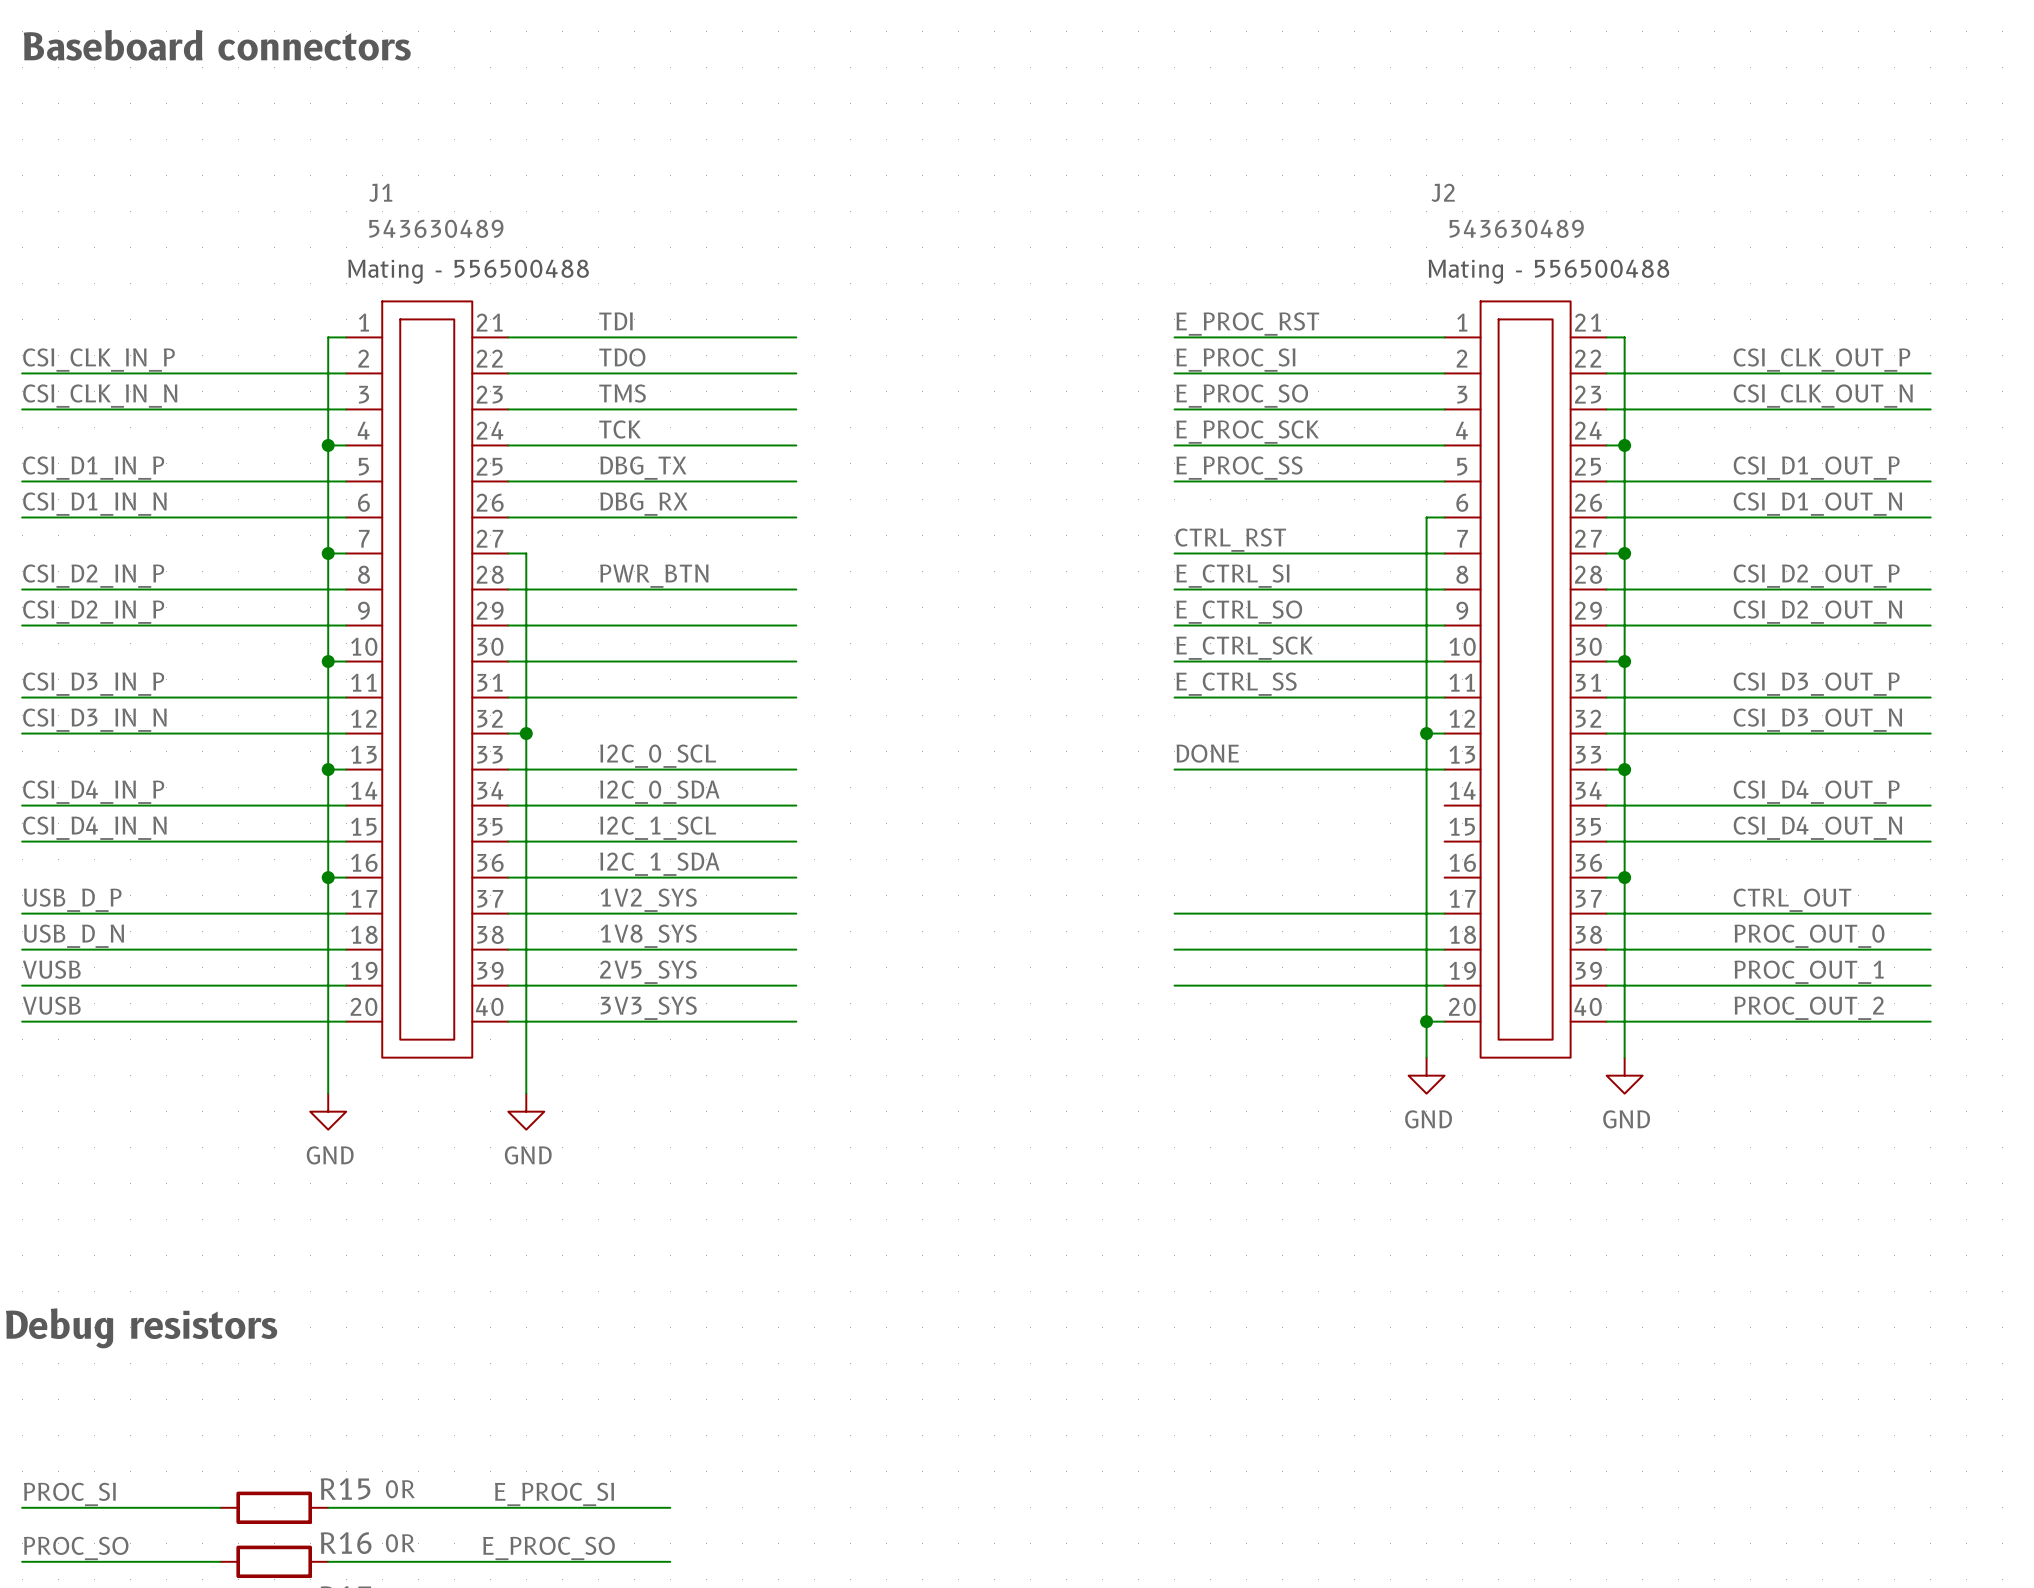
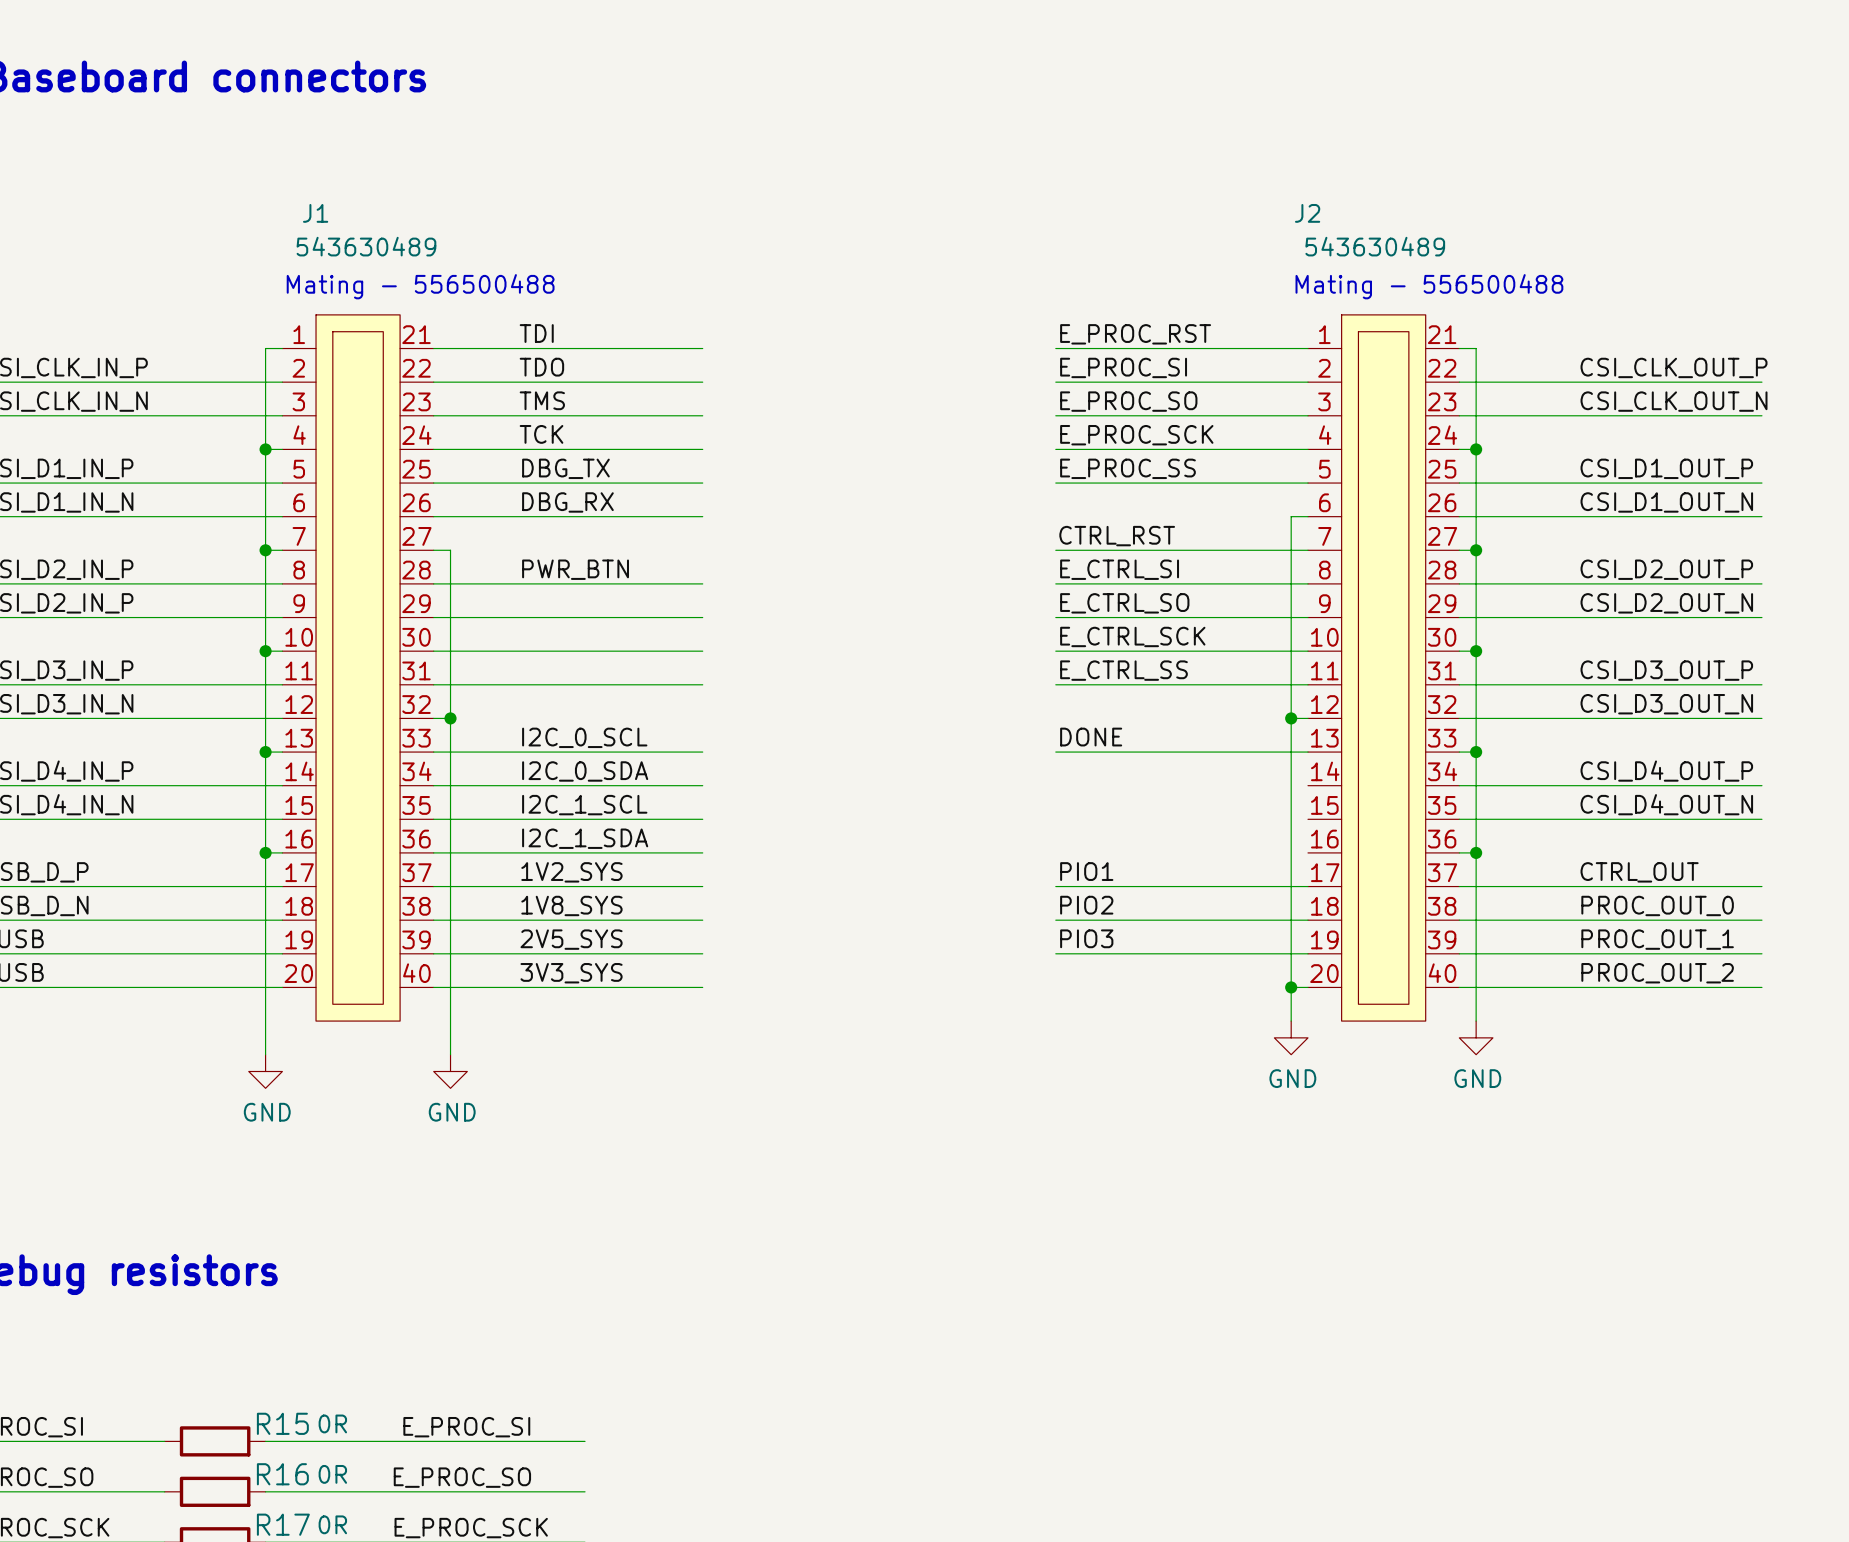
label: none -> PIO1 (1086, 871)
label: none -> PIO2 (1086, 905)
label: none -> PIO3 (1086, 938)

